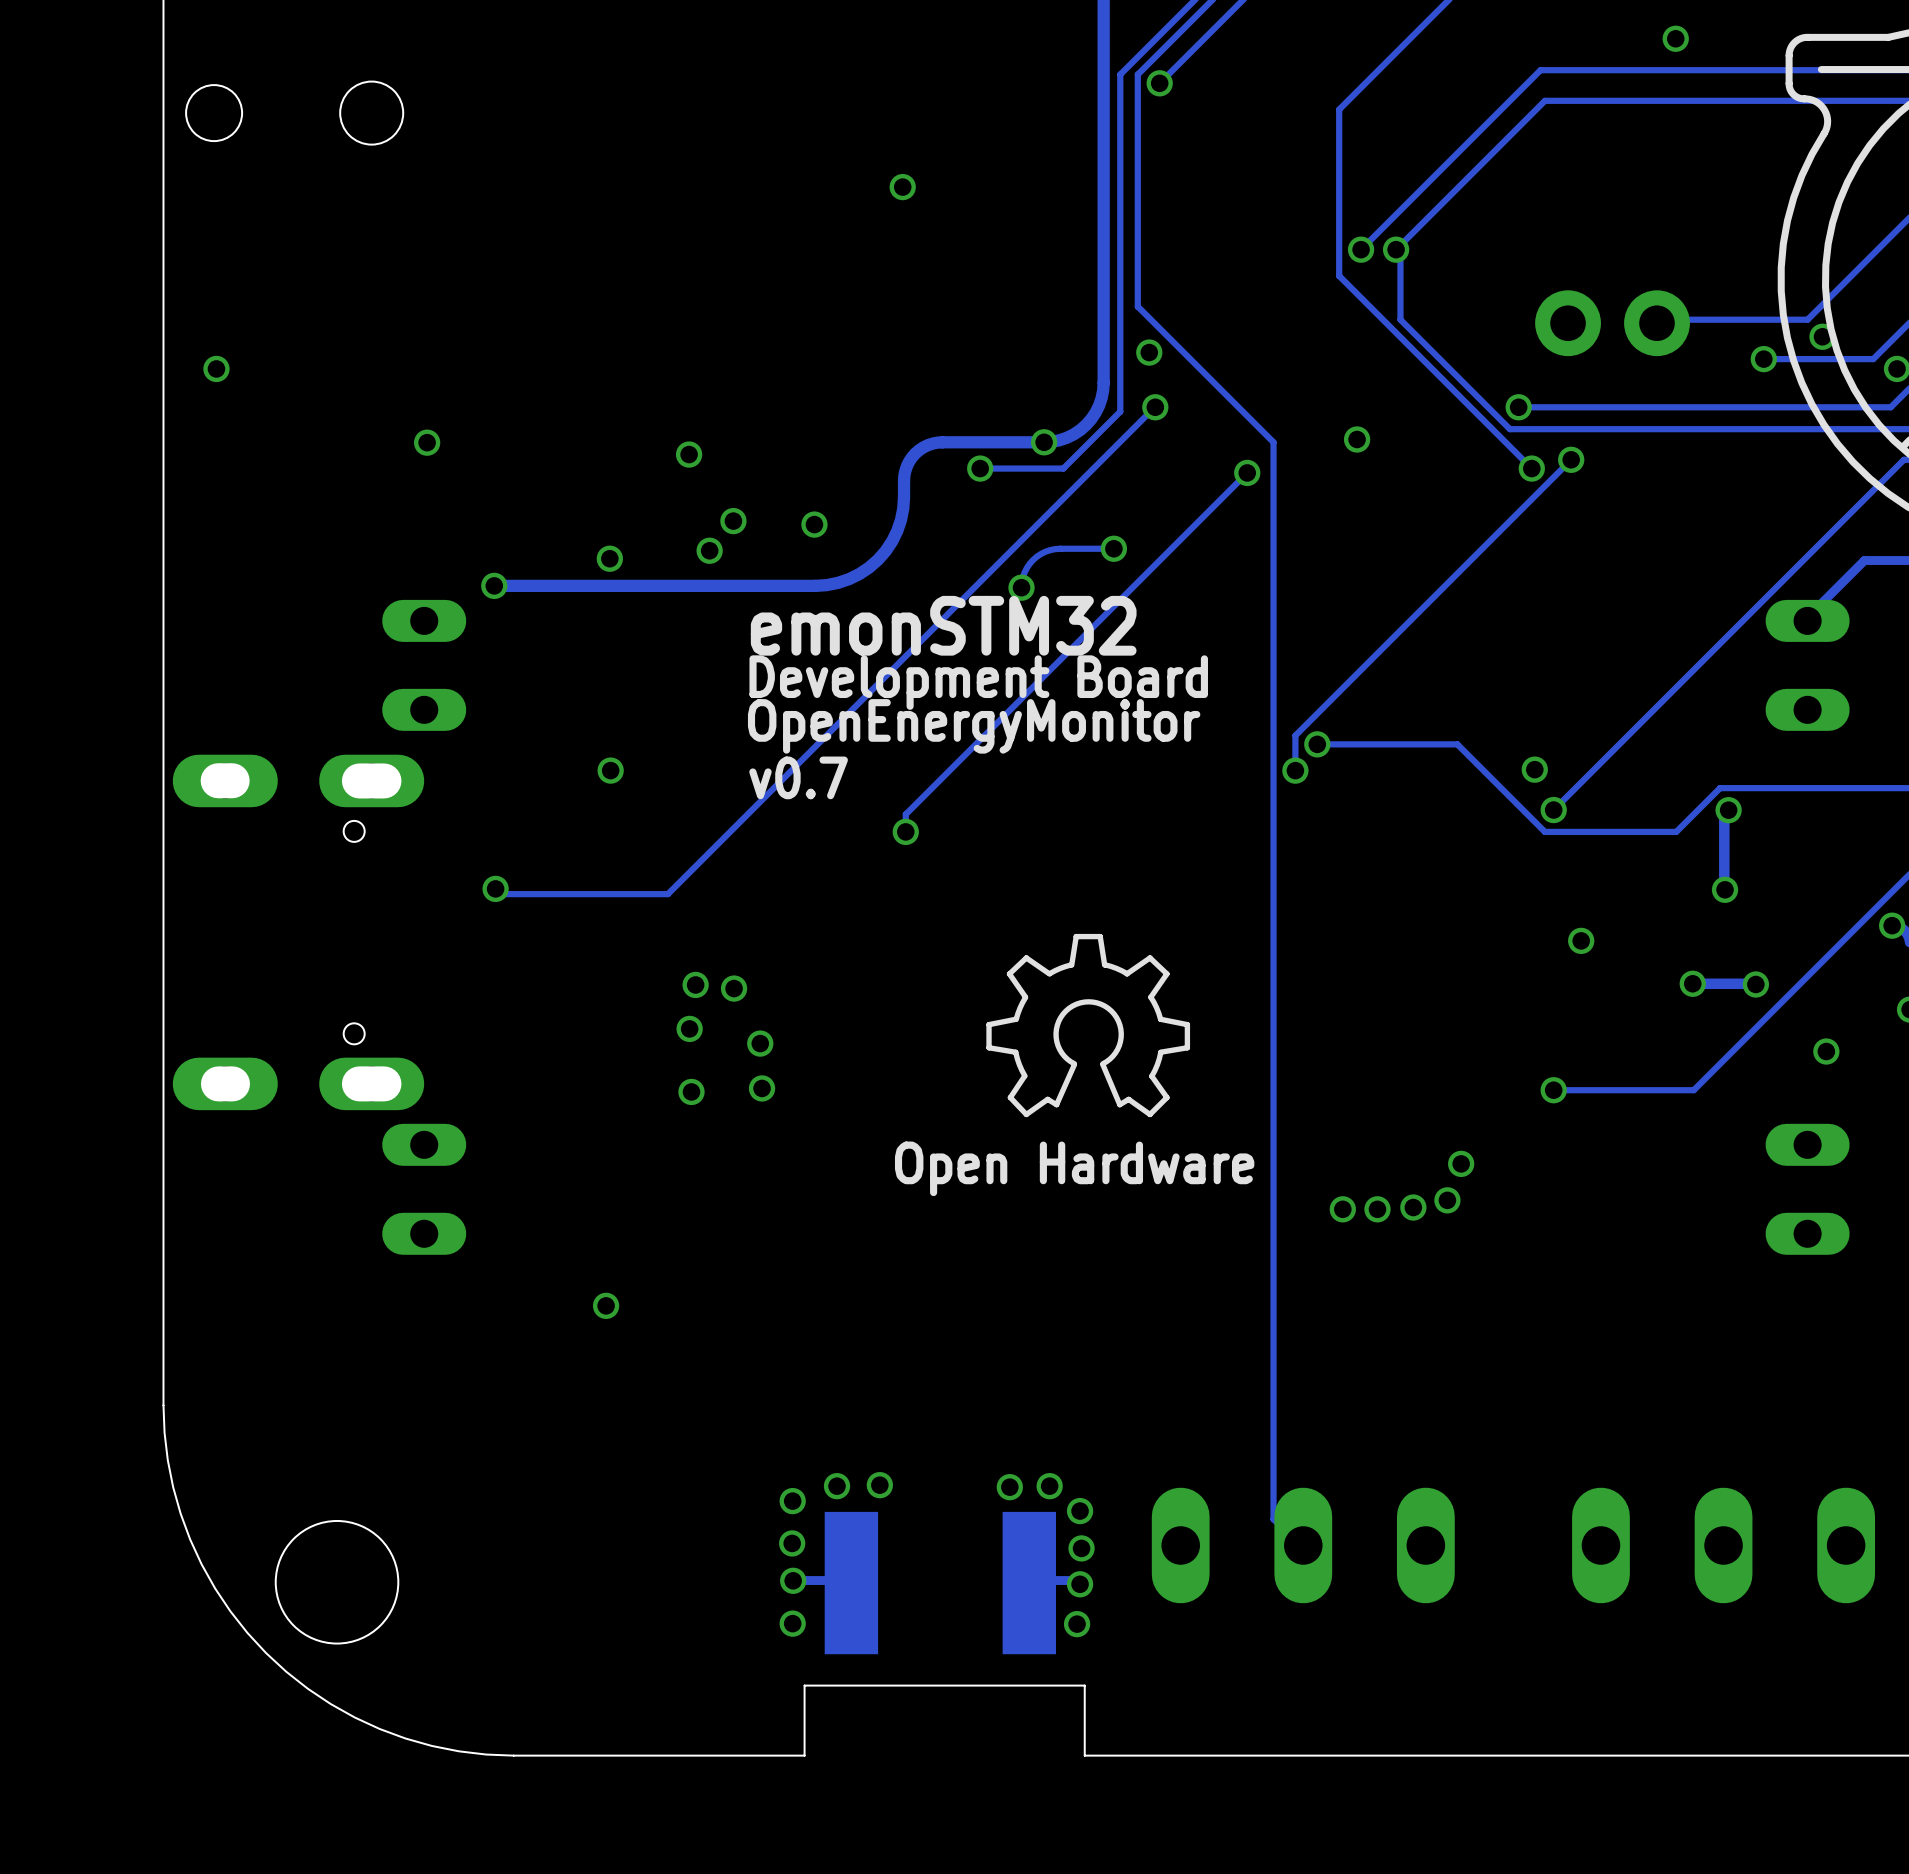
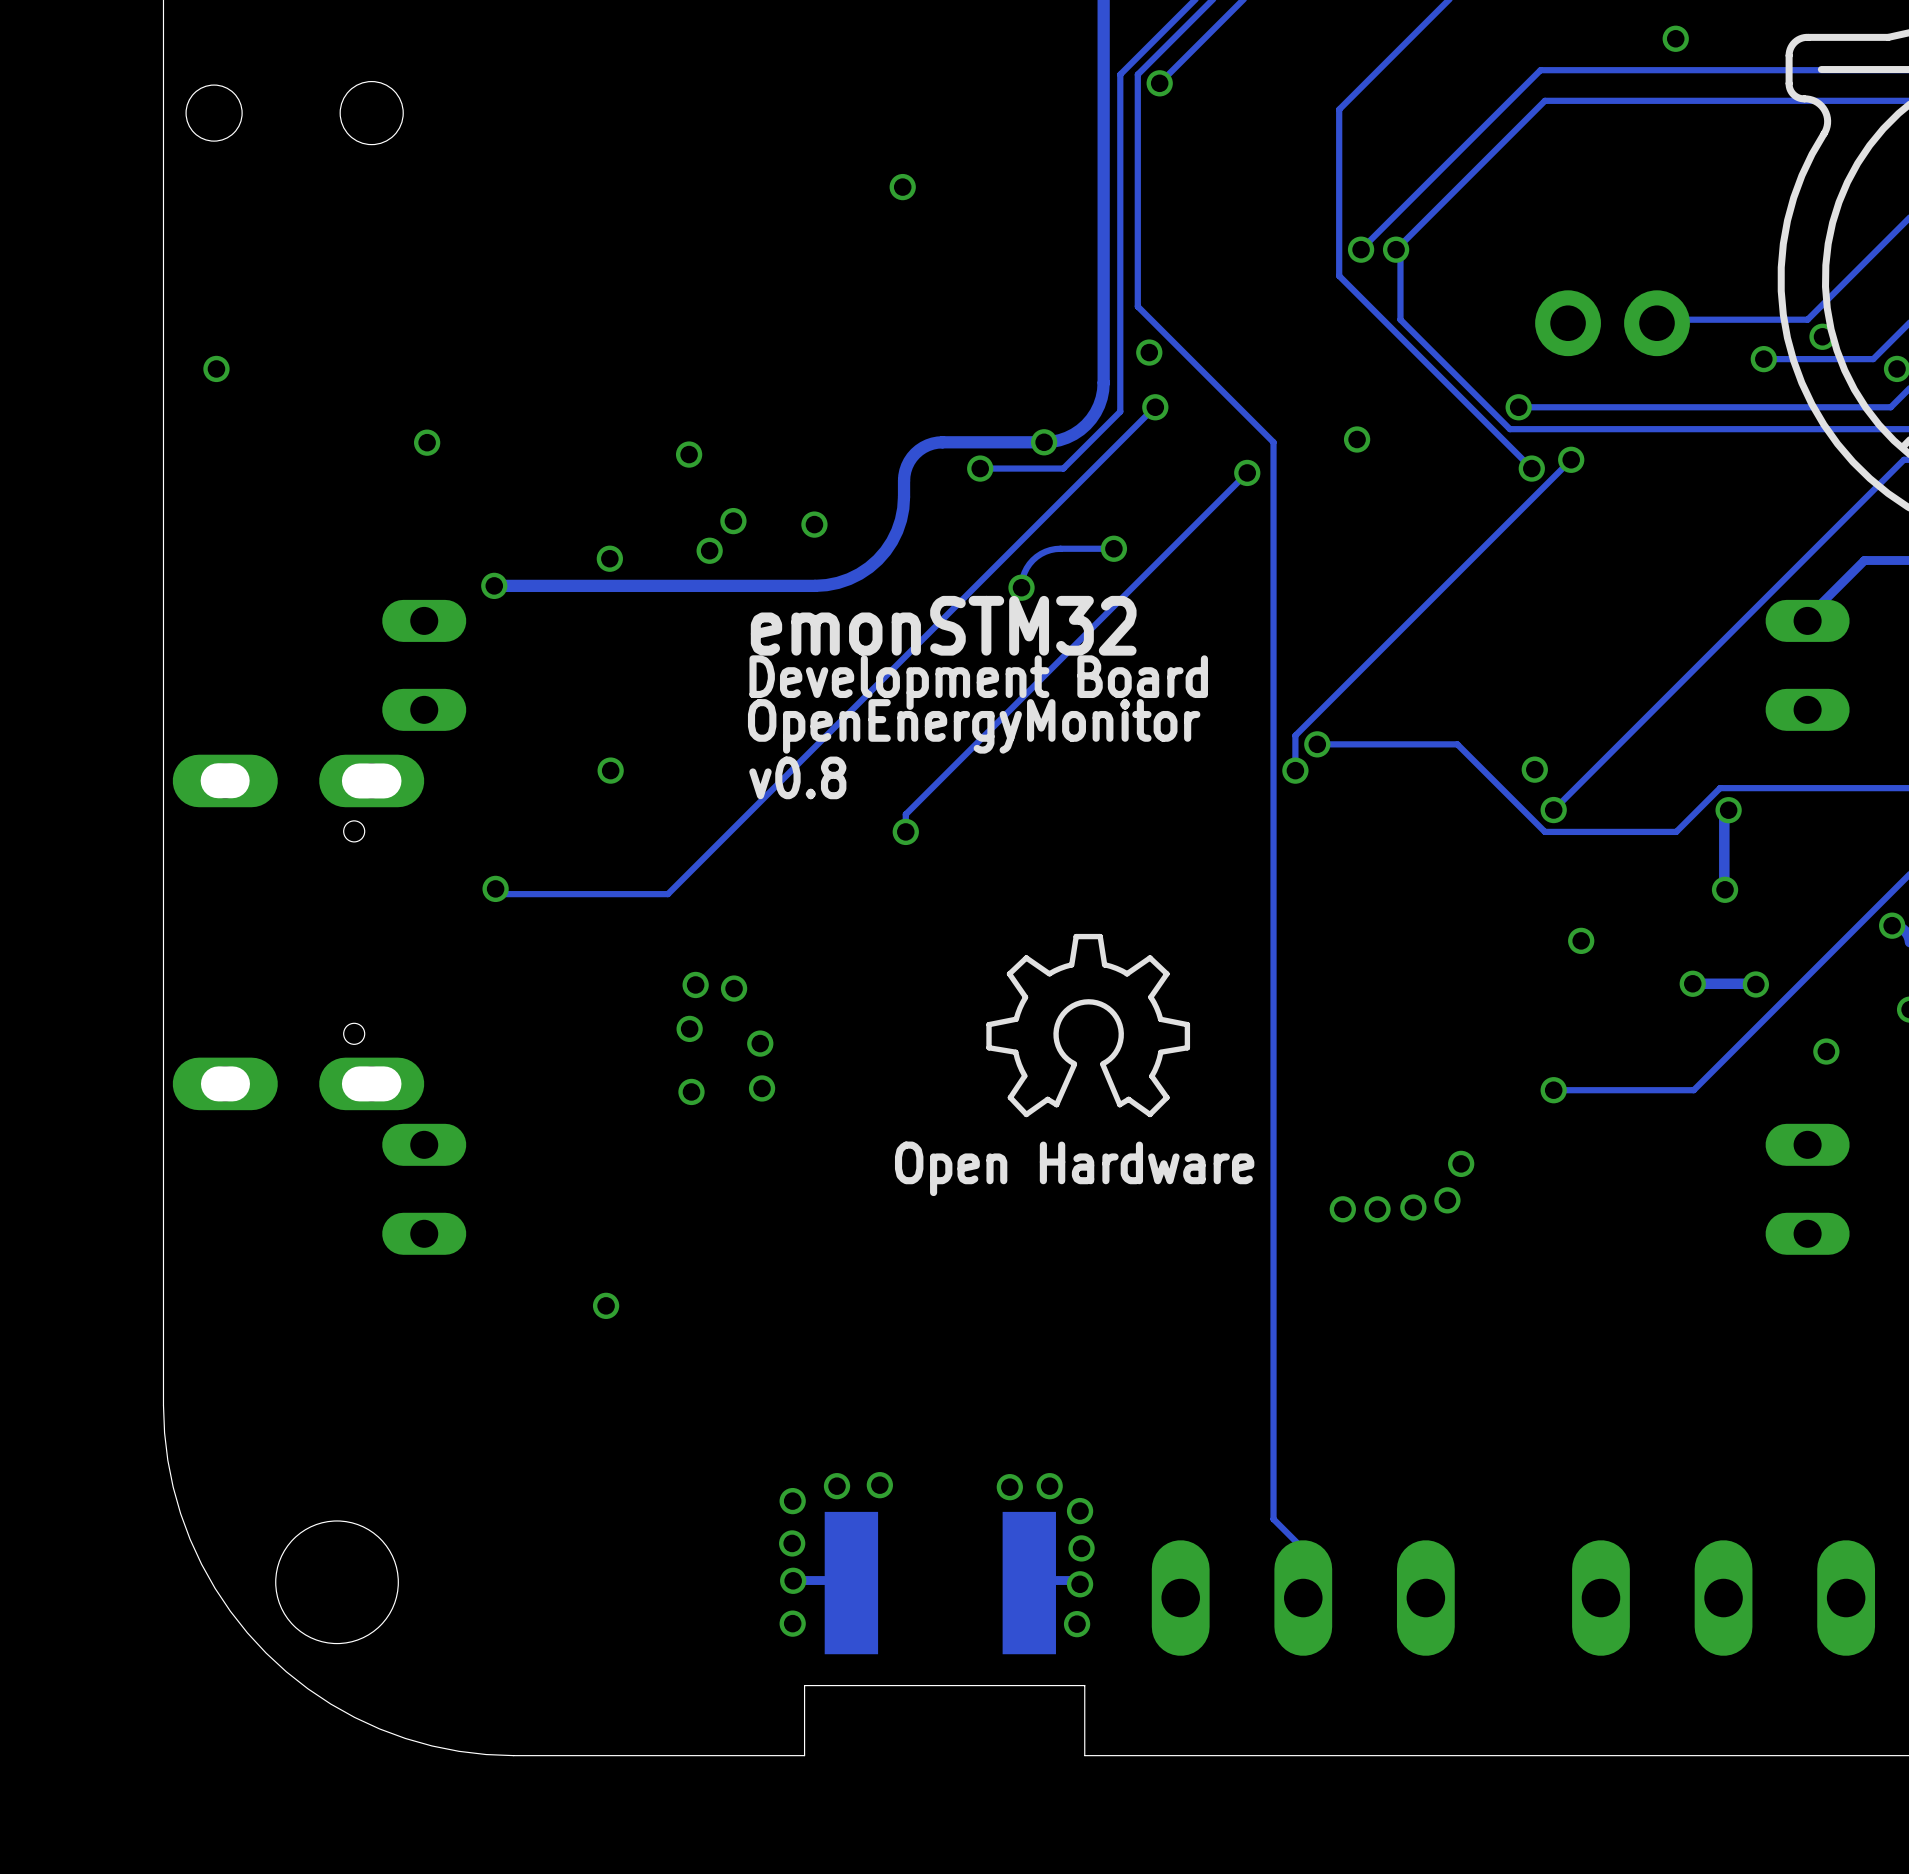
text: v0.7 (798, 777) -> v0.8 (797, 777)
part position: (1303, 1545) -> (1303, 1598)
part position: (1723, 1545) -> (1723, 1598)

